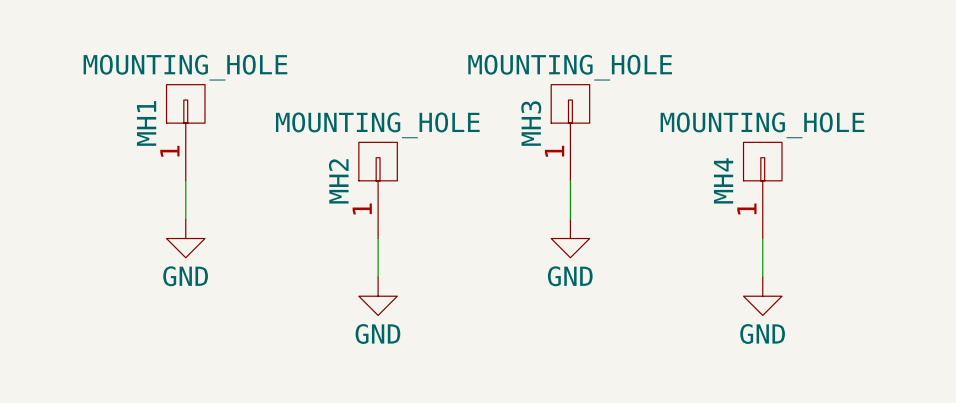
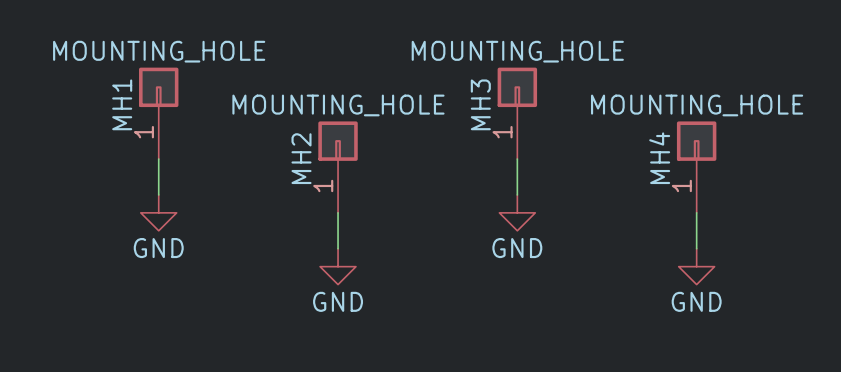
MH1 symbol: [166, 84, 205, 181] -> [139, 67, 179, 160]
MH3 symbol: [551, 84, 590, 181] -> [497, 67, 538, 160]
MH2 symbol: [358, 142, 398, 239] -> [318, 121, 358, 213]
MH4 symbol: [743, 142, 782, 239] -> [676, 121, 717, 213]

